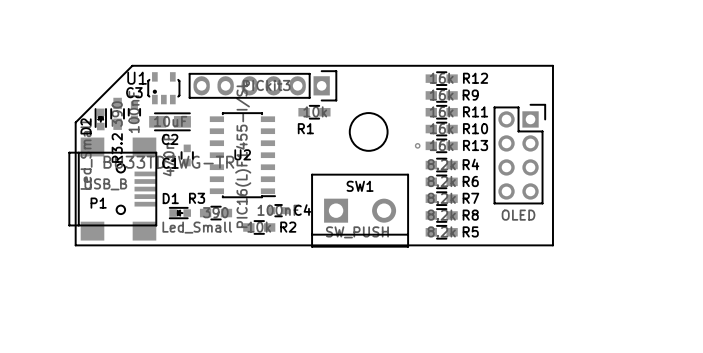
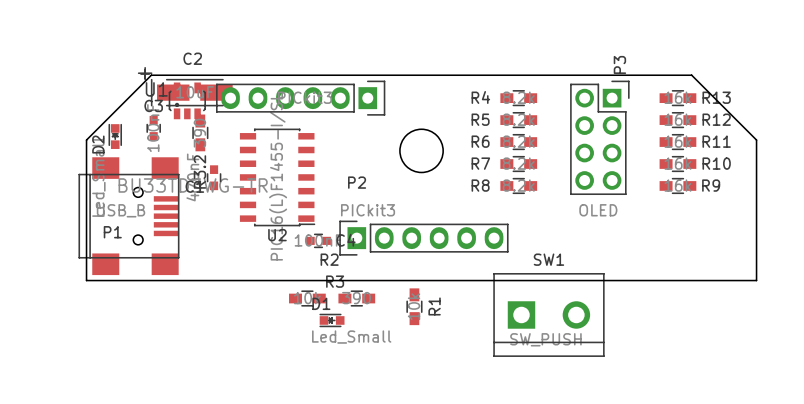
board edge: (552, 65) (552, 245) -> (632, 75) (691, 75) (756, 140) (756, 280) (632, 280)
R12 position: (441, 78) -> (677, 120)
R9 position: (441, 95) -> (677, 185)
C2 footprint: [149, 112, 191, 132] -> [137, 66, 233, 107]
R1 rotation: 0° (314, 112) -> 90° clockwise (414, 306)
R1 position: (314, 112) -> (414, 306)
R11 position: (441, 112) -> (677, 142)
R3.2 position: (117, 113) -> (200, 132)
P3: none -> OLED (599, 137)
R1 name position: R1 (305, 128) -> R1 (434, 306)
R10 position: (441, 129) -> (677, 164)
C2 name position: C2 (170, 139) -> C2 (192, 58)
part: (417, 145) -> none
R13 position: (441, 145) -> (677, 98)
U2 name position: U2 (242, 154) -> U2 (277, 235)
part: OLED (519, 154) -> none
R4 name position: R4 (470, 164) -> R4 (480, 97)
R4 position: (441, 165) -> (518, 98)
R6 position: (441, 181) -> (518, 142)
R6 name position: R6 (470, 181) -> R6 (480, 141)
SW1 name position: SW1 (360, 186) -> SW1 (548, 259)
R7 position: (441, 198) -> (518, 164)
R7 name position: R7 (470, 198) -> R7 (480, 163)
P2: none -> PICkit3 (423, 238)
SW1 position: (360, 210) -> (548, 314)
D1 position: (180, 213) -> (331, 320)
R3 position: (216, 213) -> (356, 298)
R8 position: (441, 215) -> (518, 185)
R8 name position: R8 (470, 215) -> R8 (480, 185)
R2 position: (259, 227) -> (307, 298)
R5 name position: R5 (470, 231) -> R5 (480, 119)
R5 position: (441, 232) -> (518, 120)

